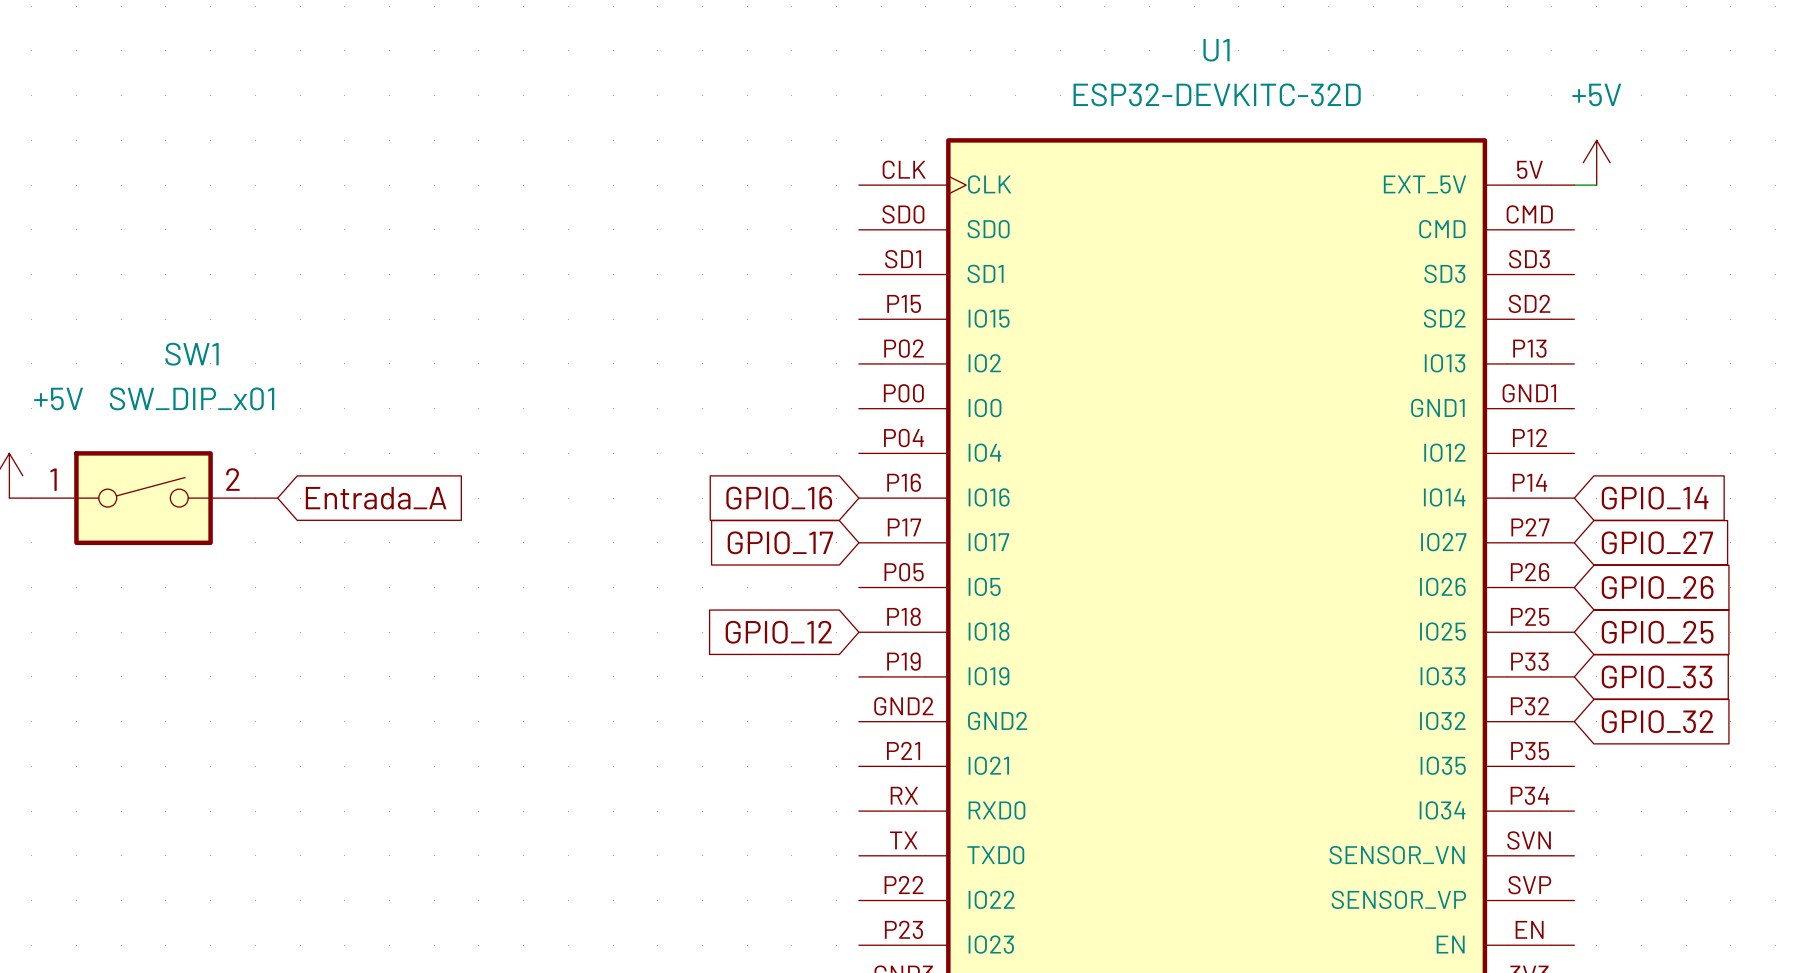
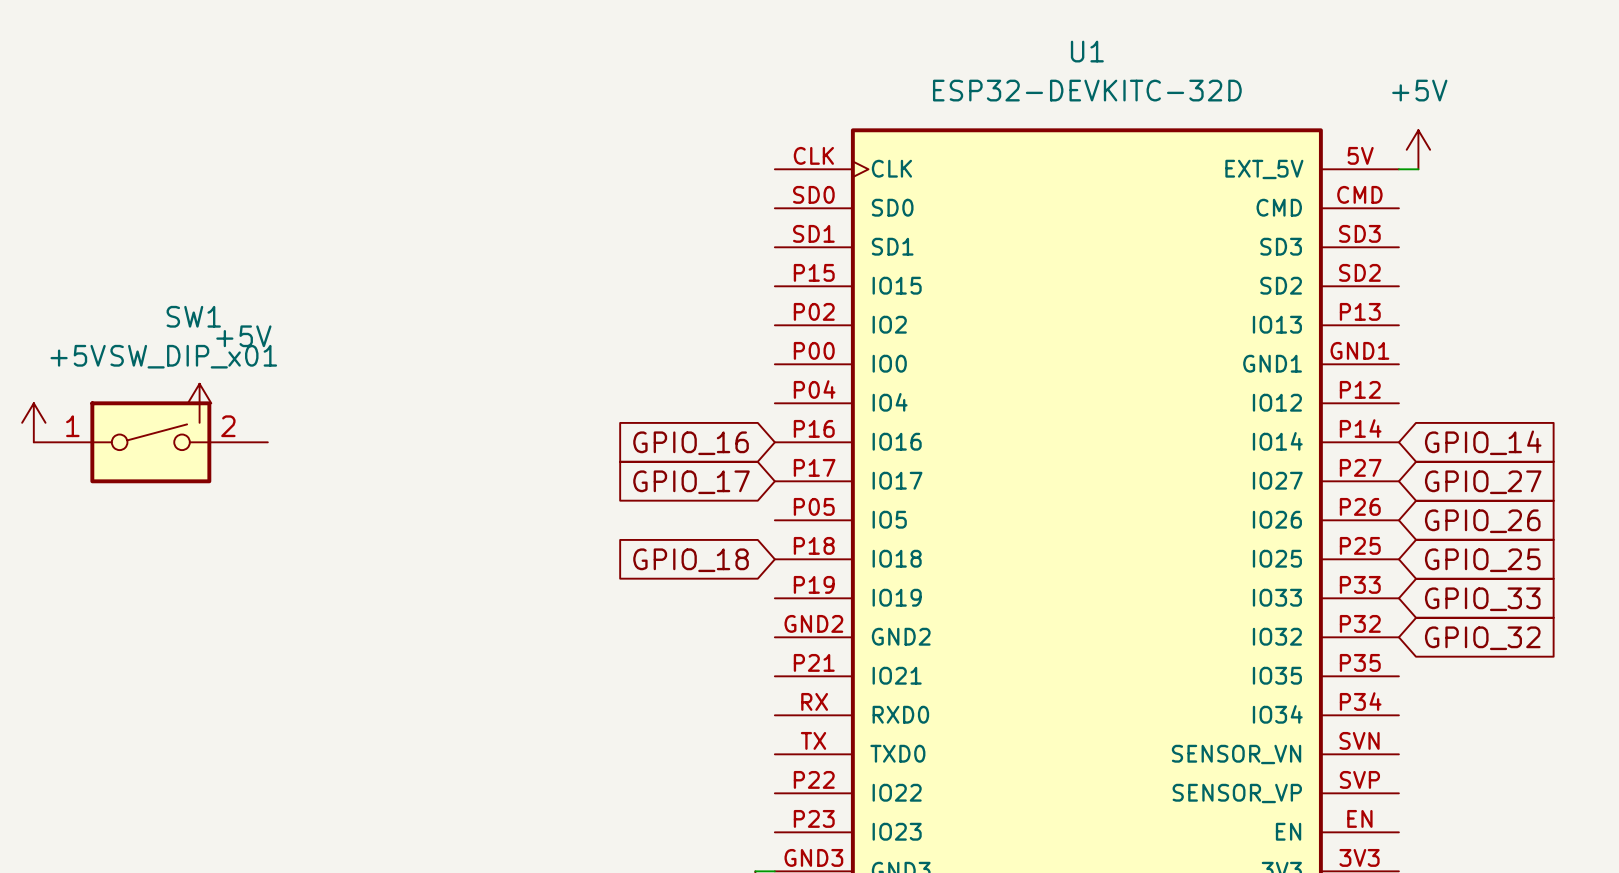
power symbol: none -> +5V (199, 403)
global label: Entrada_A (376, 498) -> none
global label: GPIO_12 (778, 632) -> GPIO_18 (691, 560)

